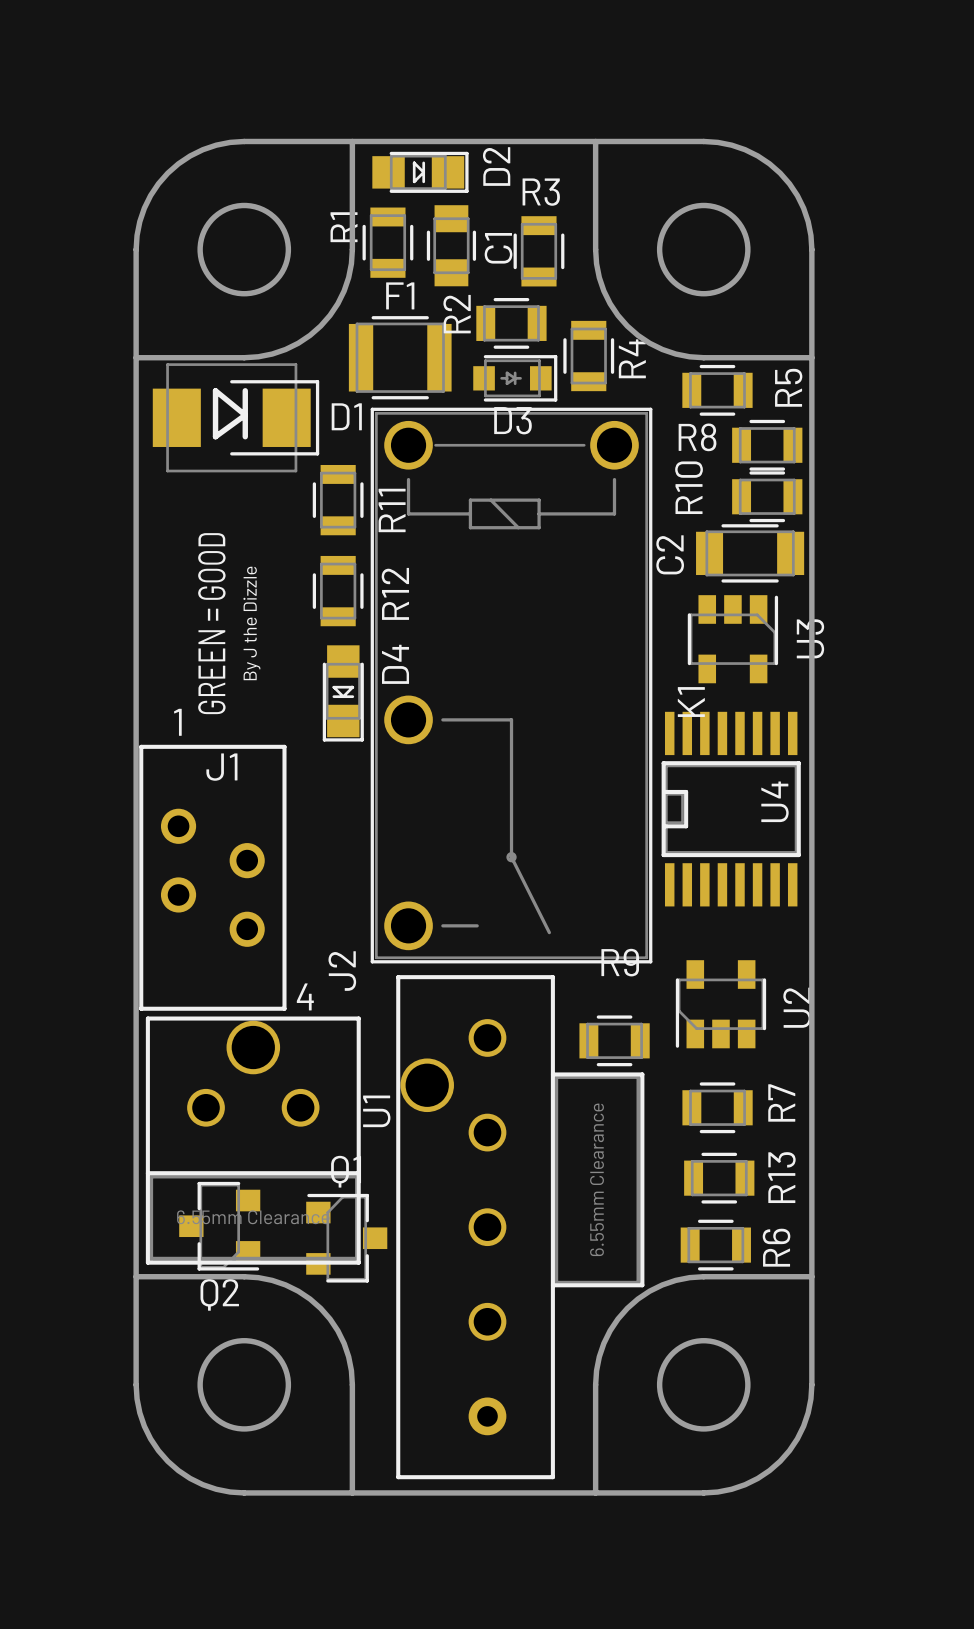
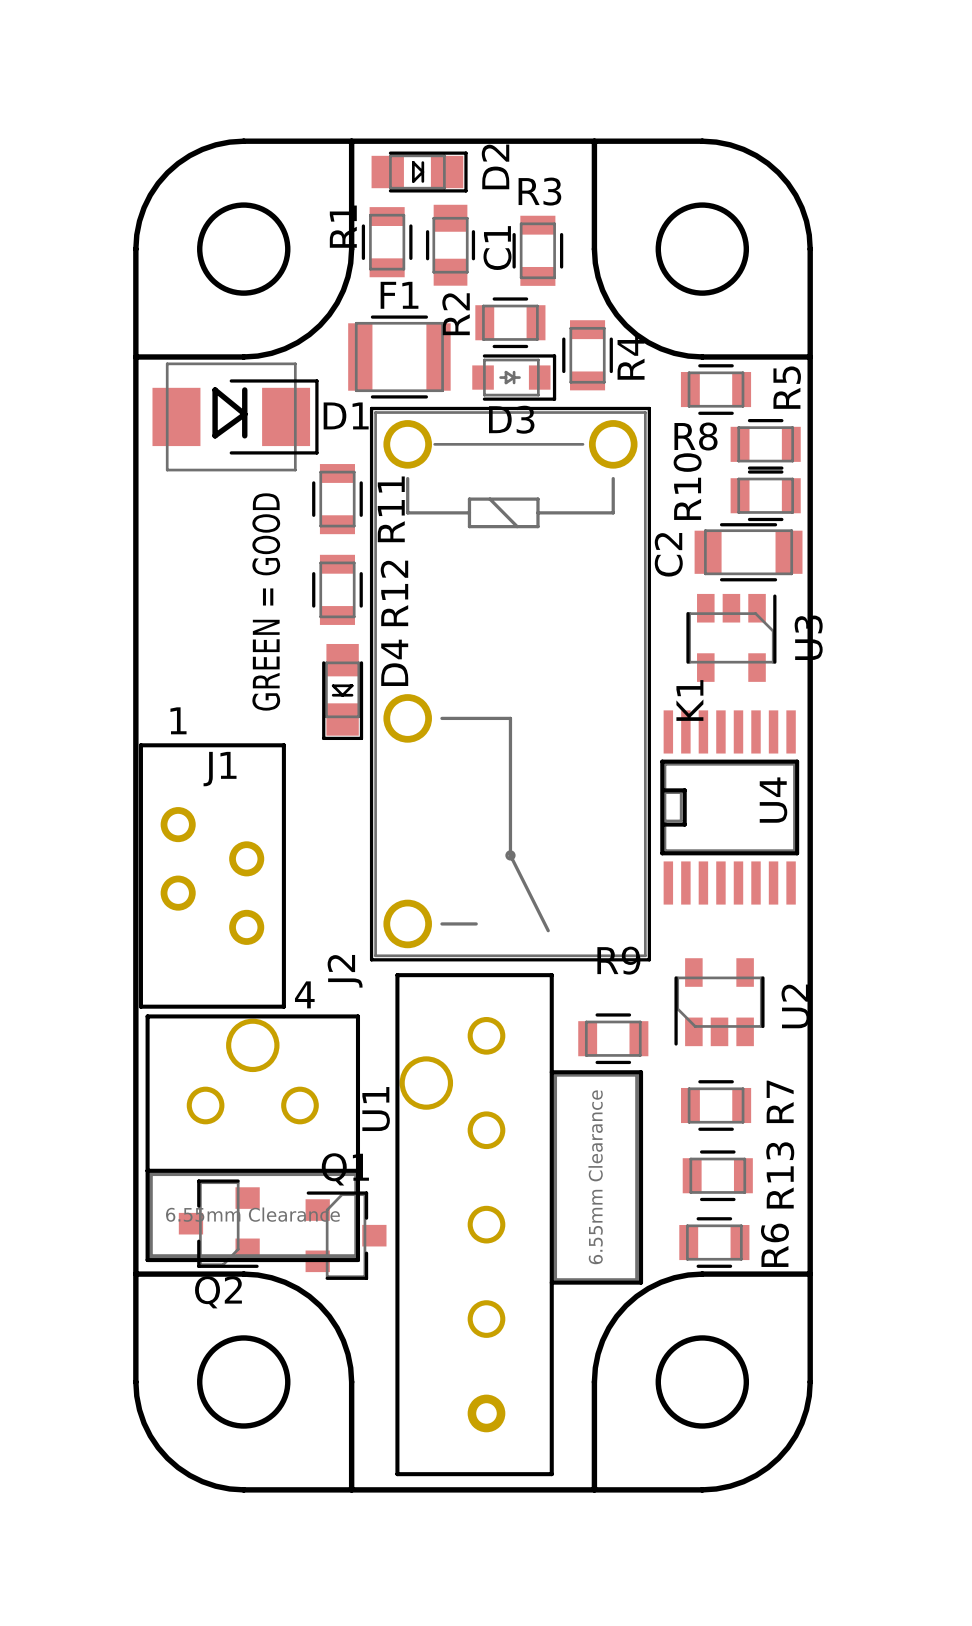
text: GREEN = GOOD (211, 623) -> none
text: By J the Dizzle (251, 623) -> GREEN = GOOD (266, 601)

